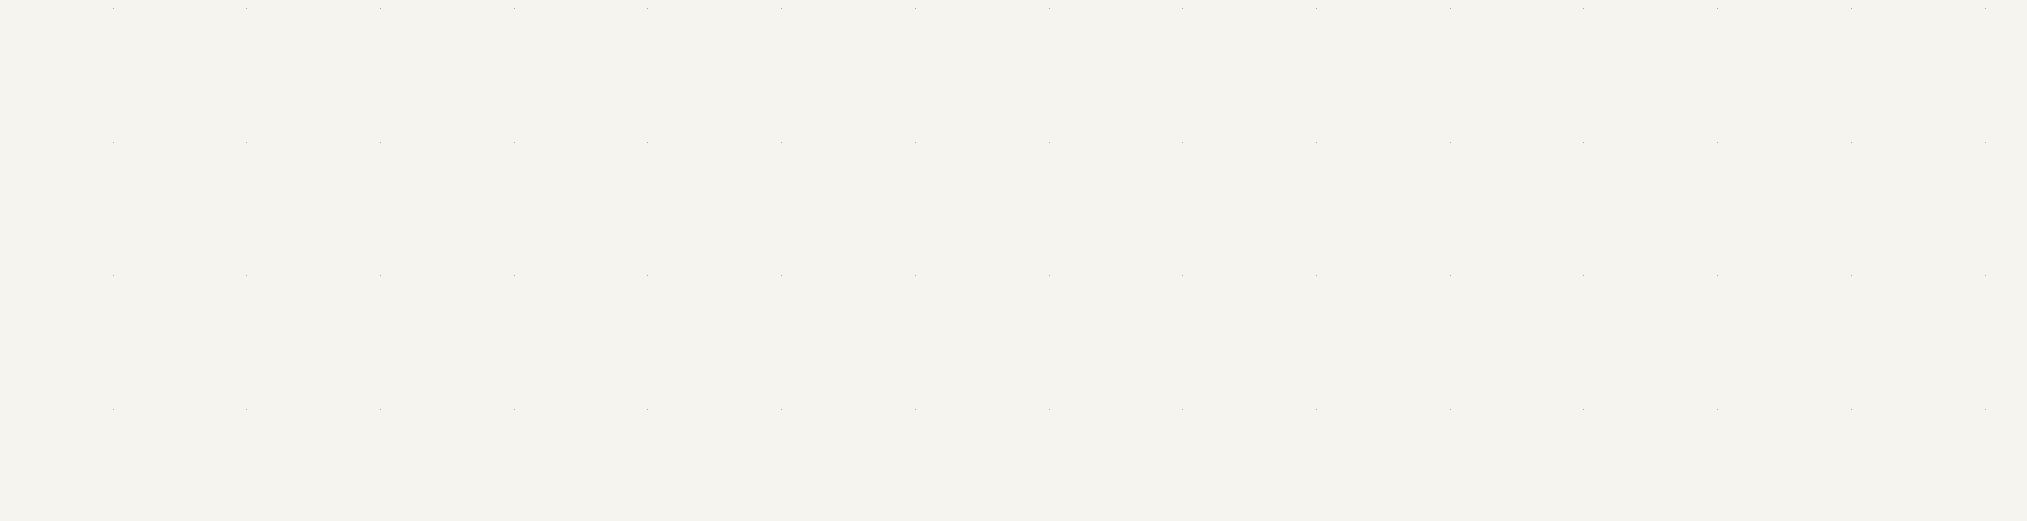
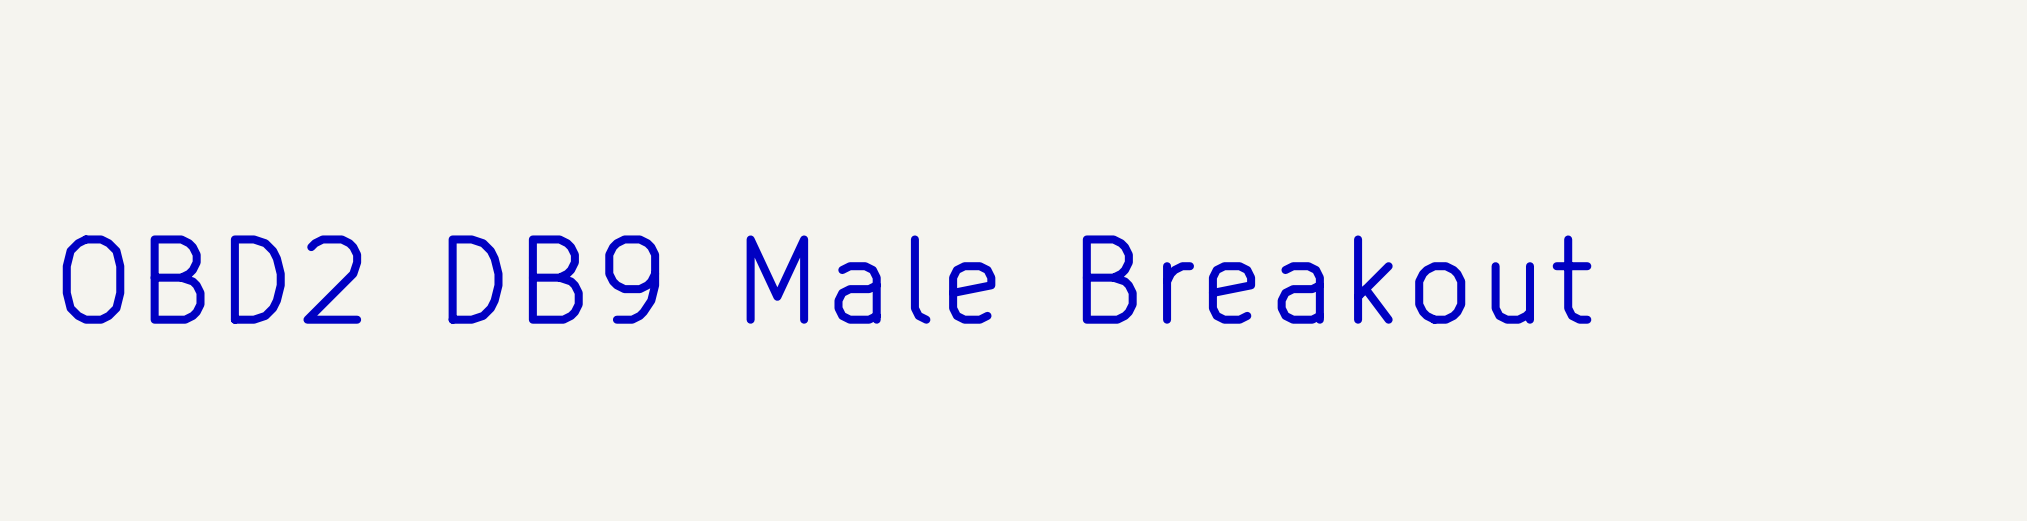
text: none -> OBD2 DB9 Male Breakout (827, 279)

